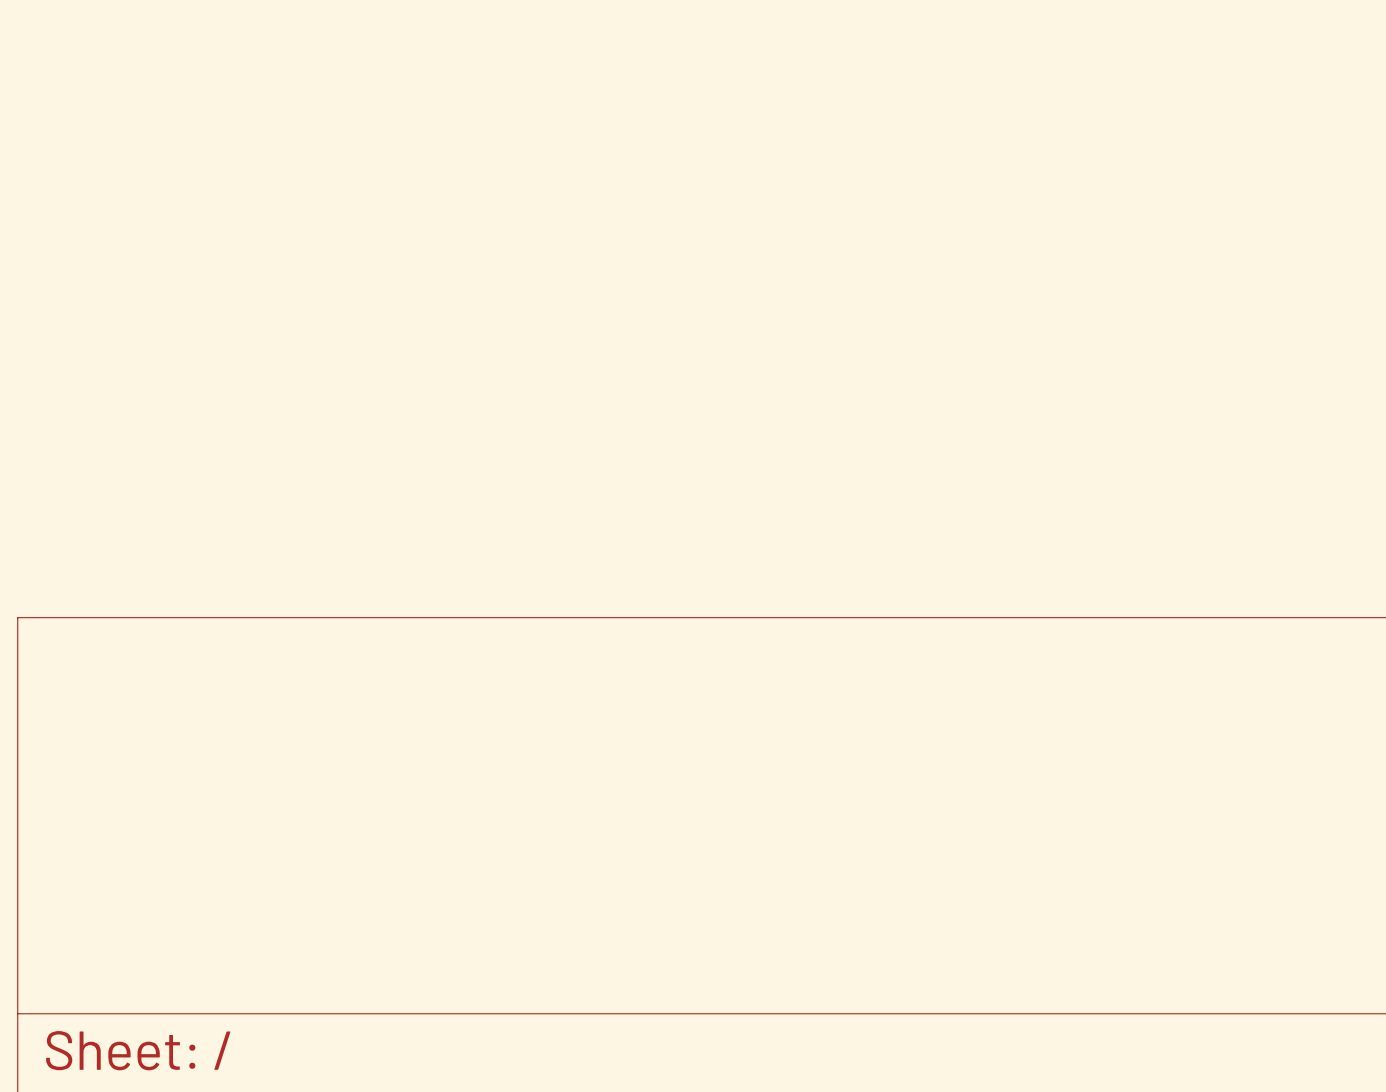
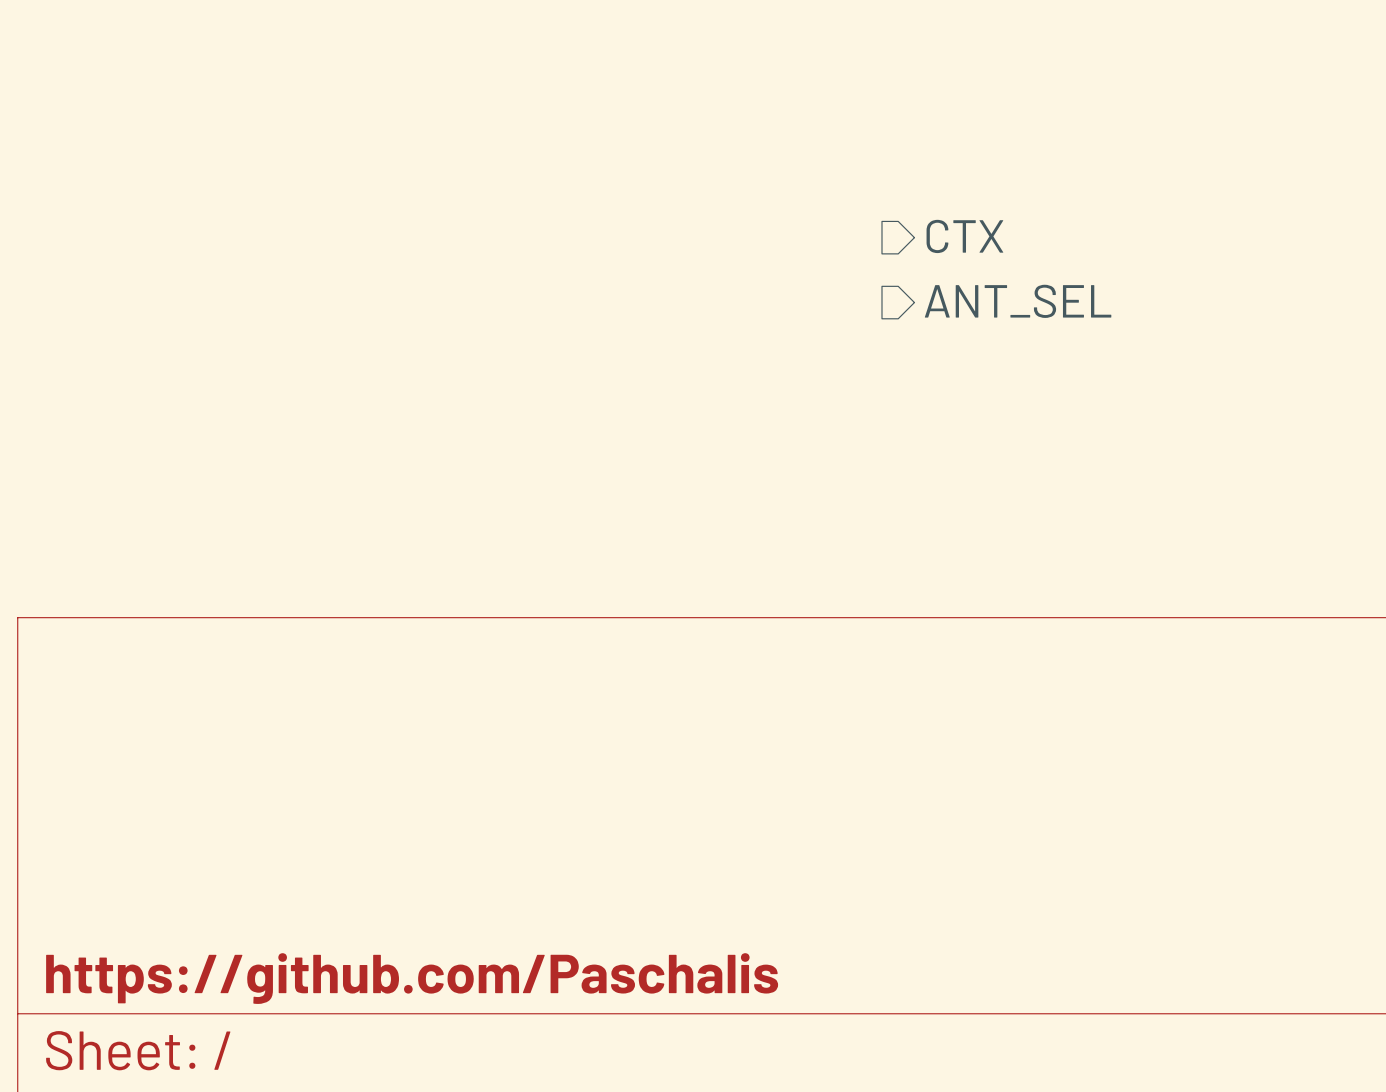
sheet pin: none -> CTX (964, 236)
sheet pin: none -> ANT_SEL (1018, 301)
title block: none -> https://github.com/Paschalis (412, 978)

